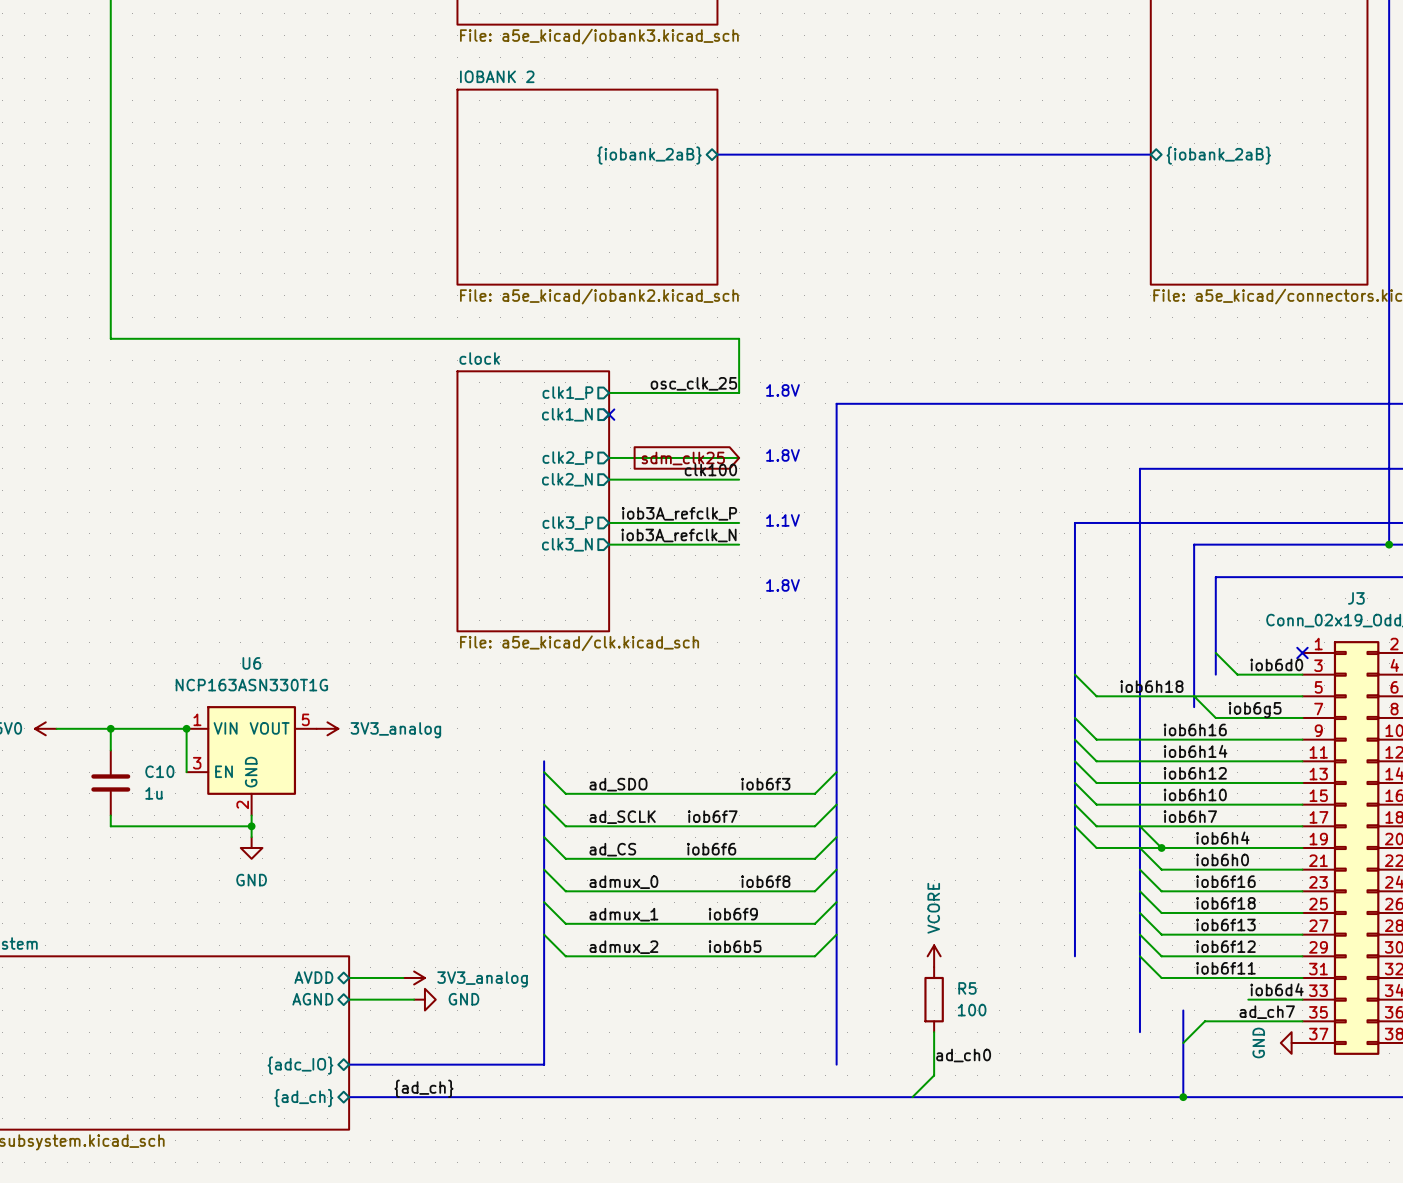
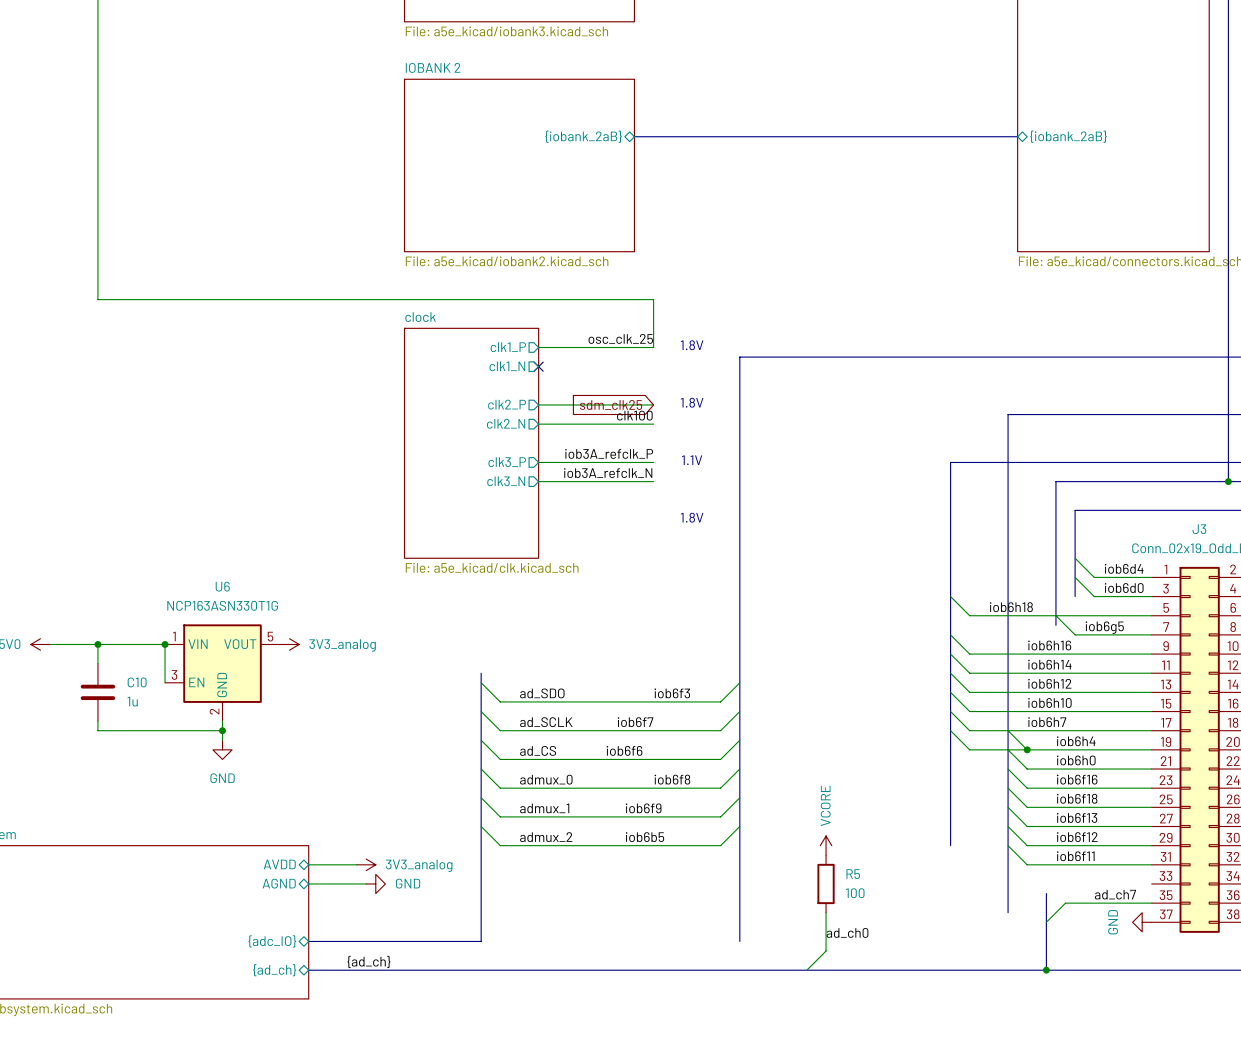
wire: none -> (1075, 558) (1094, 577) (1151, 577)
label: none -> iob6d4 (1124, 568)
no-connect mark: (1302, 652) -> none
label: iob6d4 (1277, 989) -> none
wire: (1248, 999) (1302, 999) -> none

